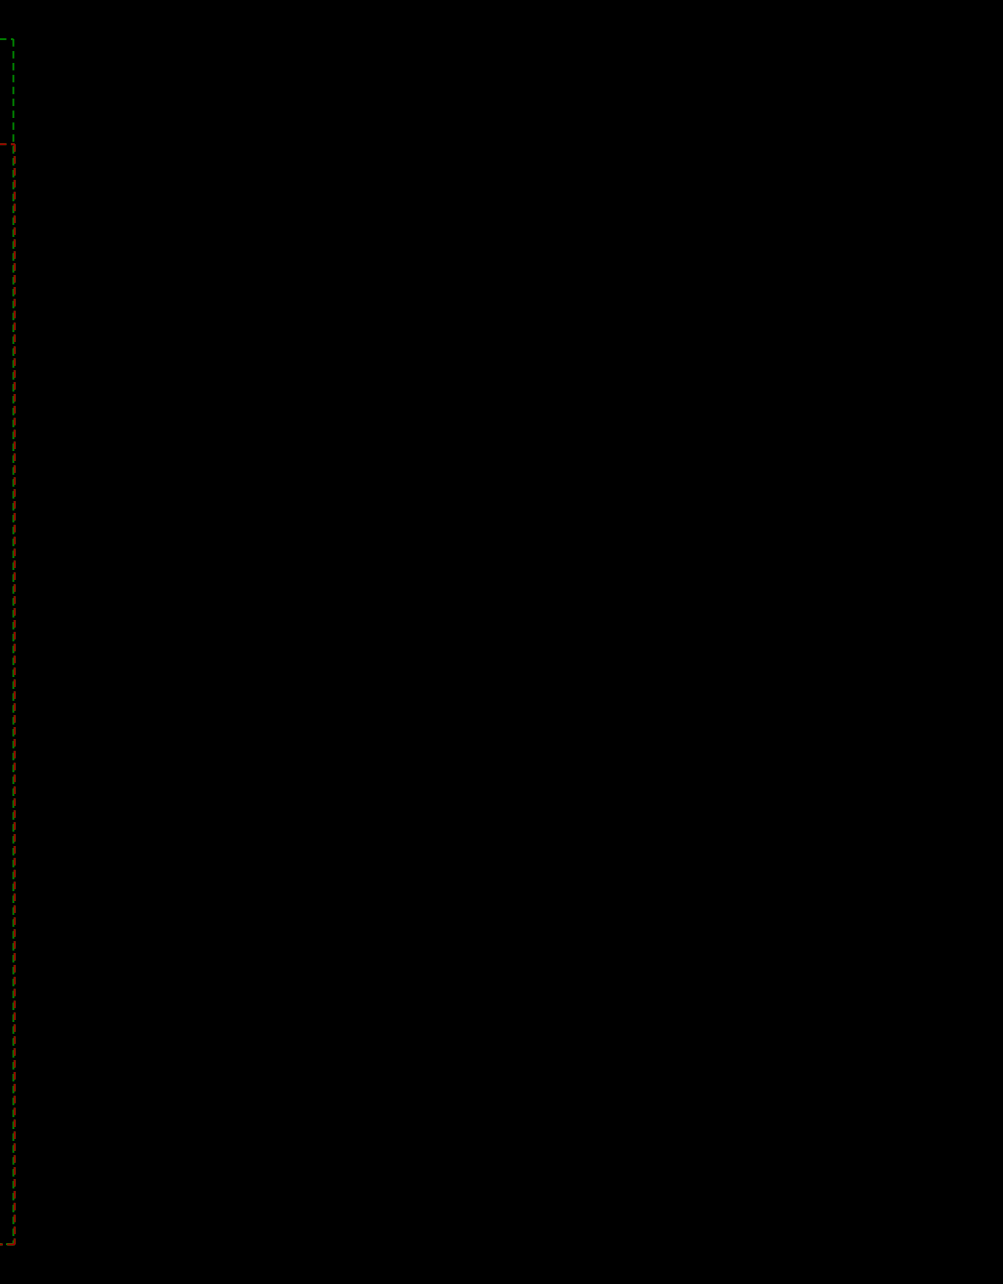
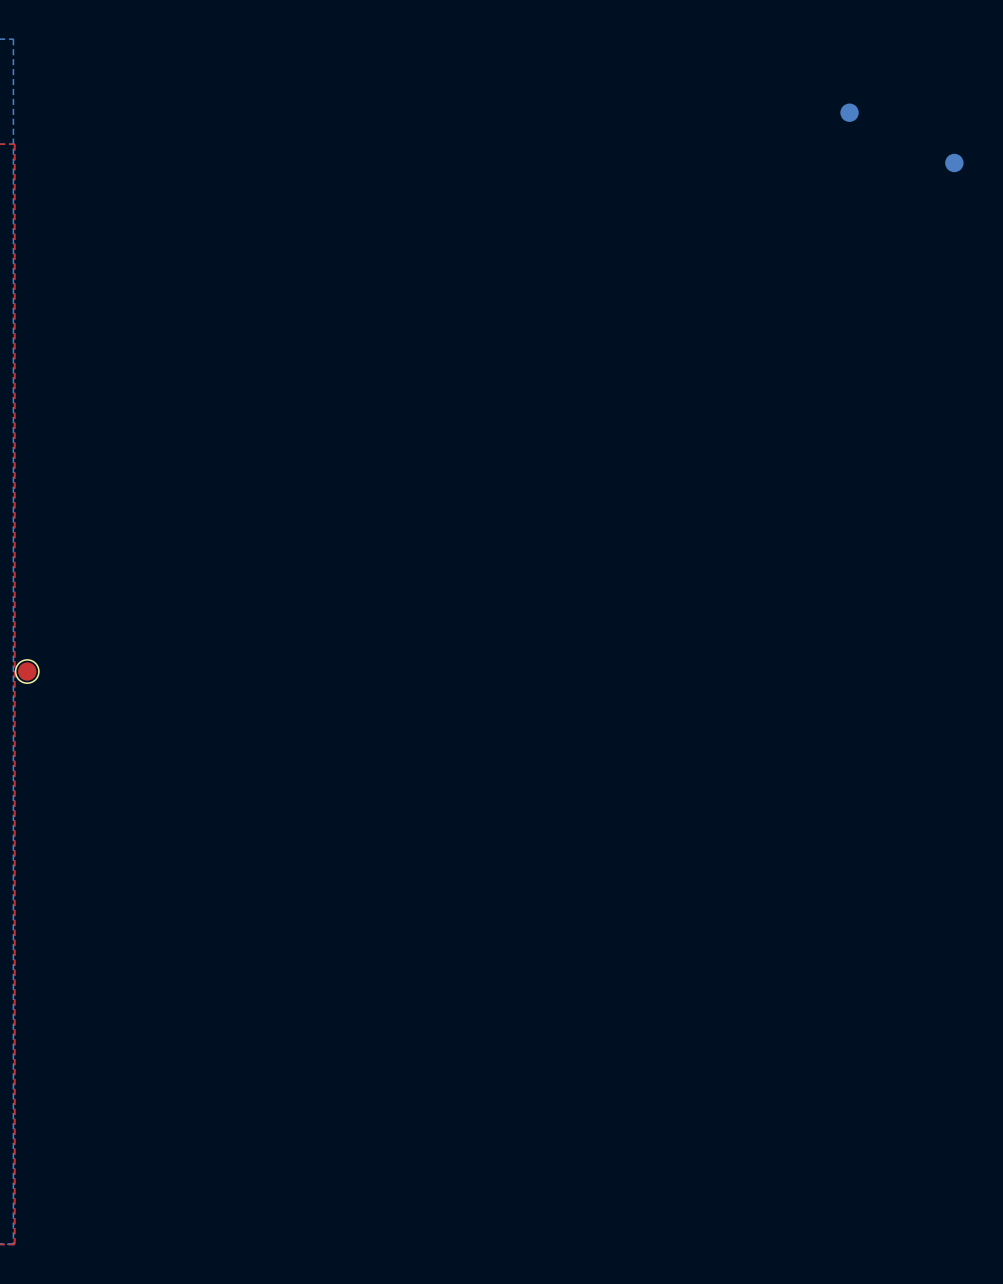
part: none -> (849, 112)
part: none -> (954, 162)
part: none -> (27, 671)

